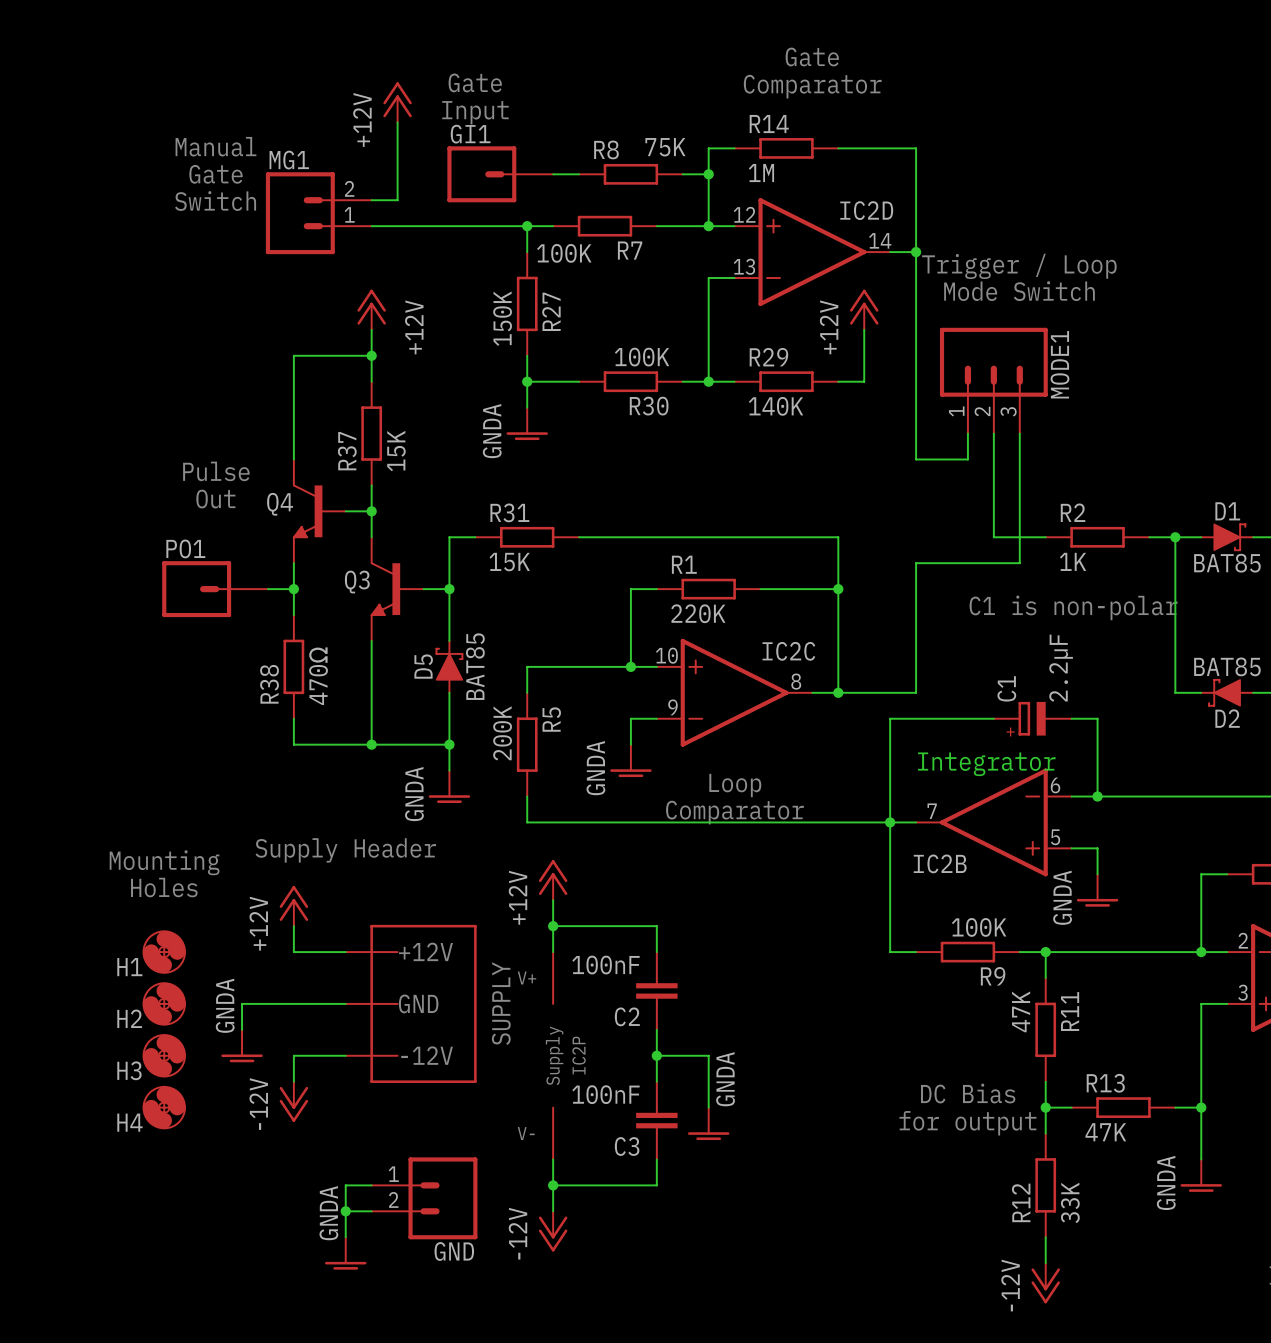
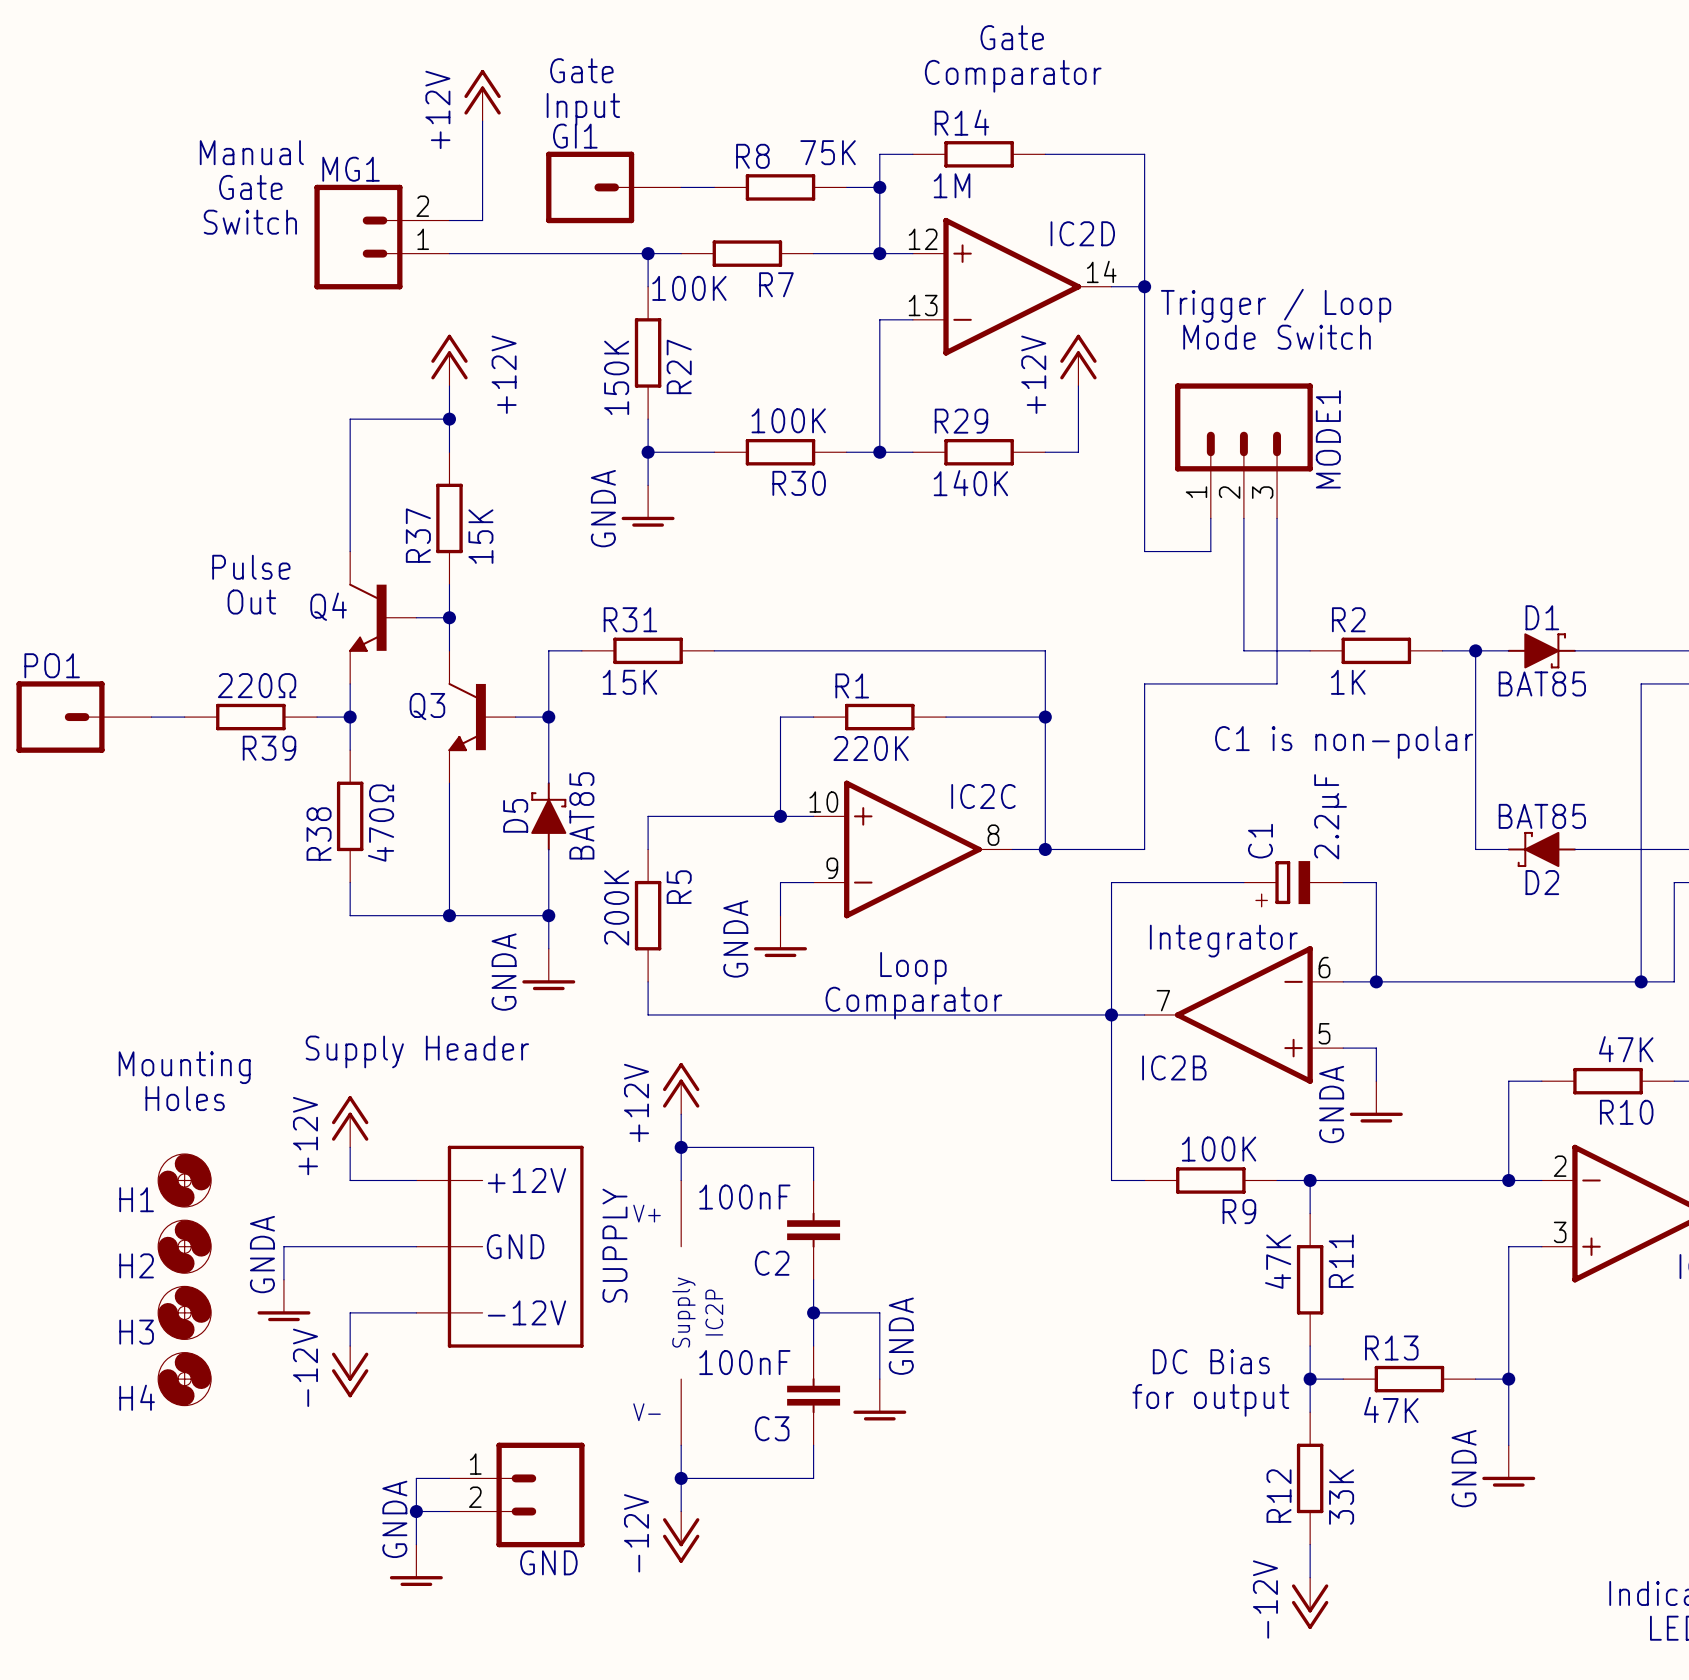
wire: none -> (151, 717) (184, 717)
PO1 position: (215, 589) -> (84, 717)
R39: none -> 220Ω (250, 717)

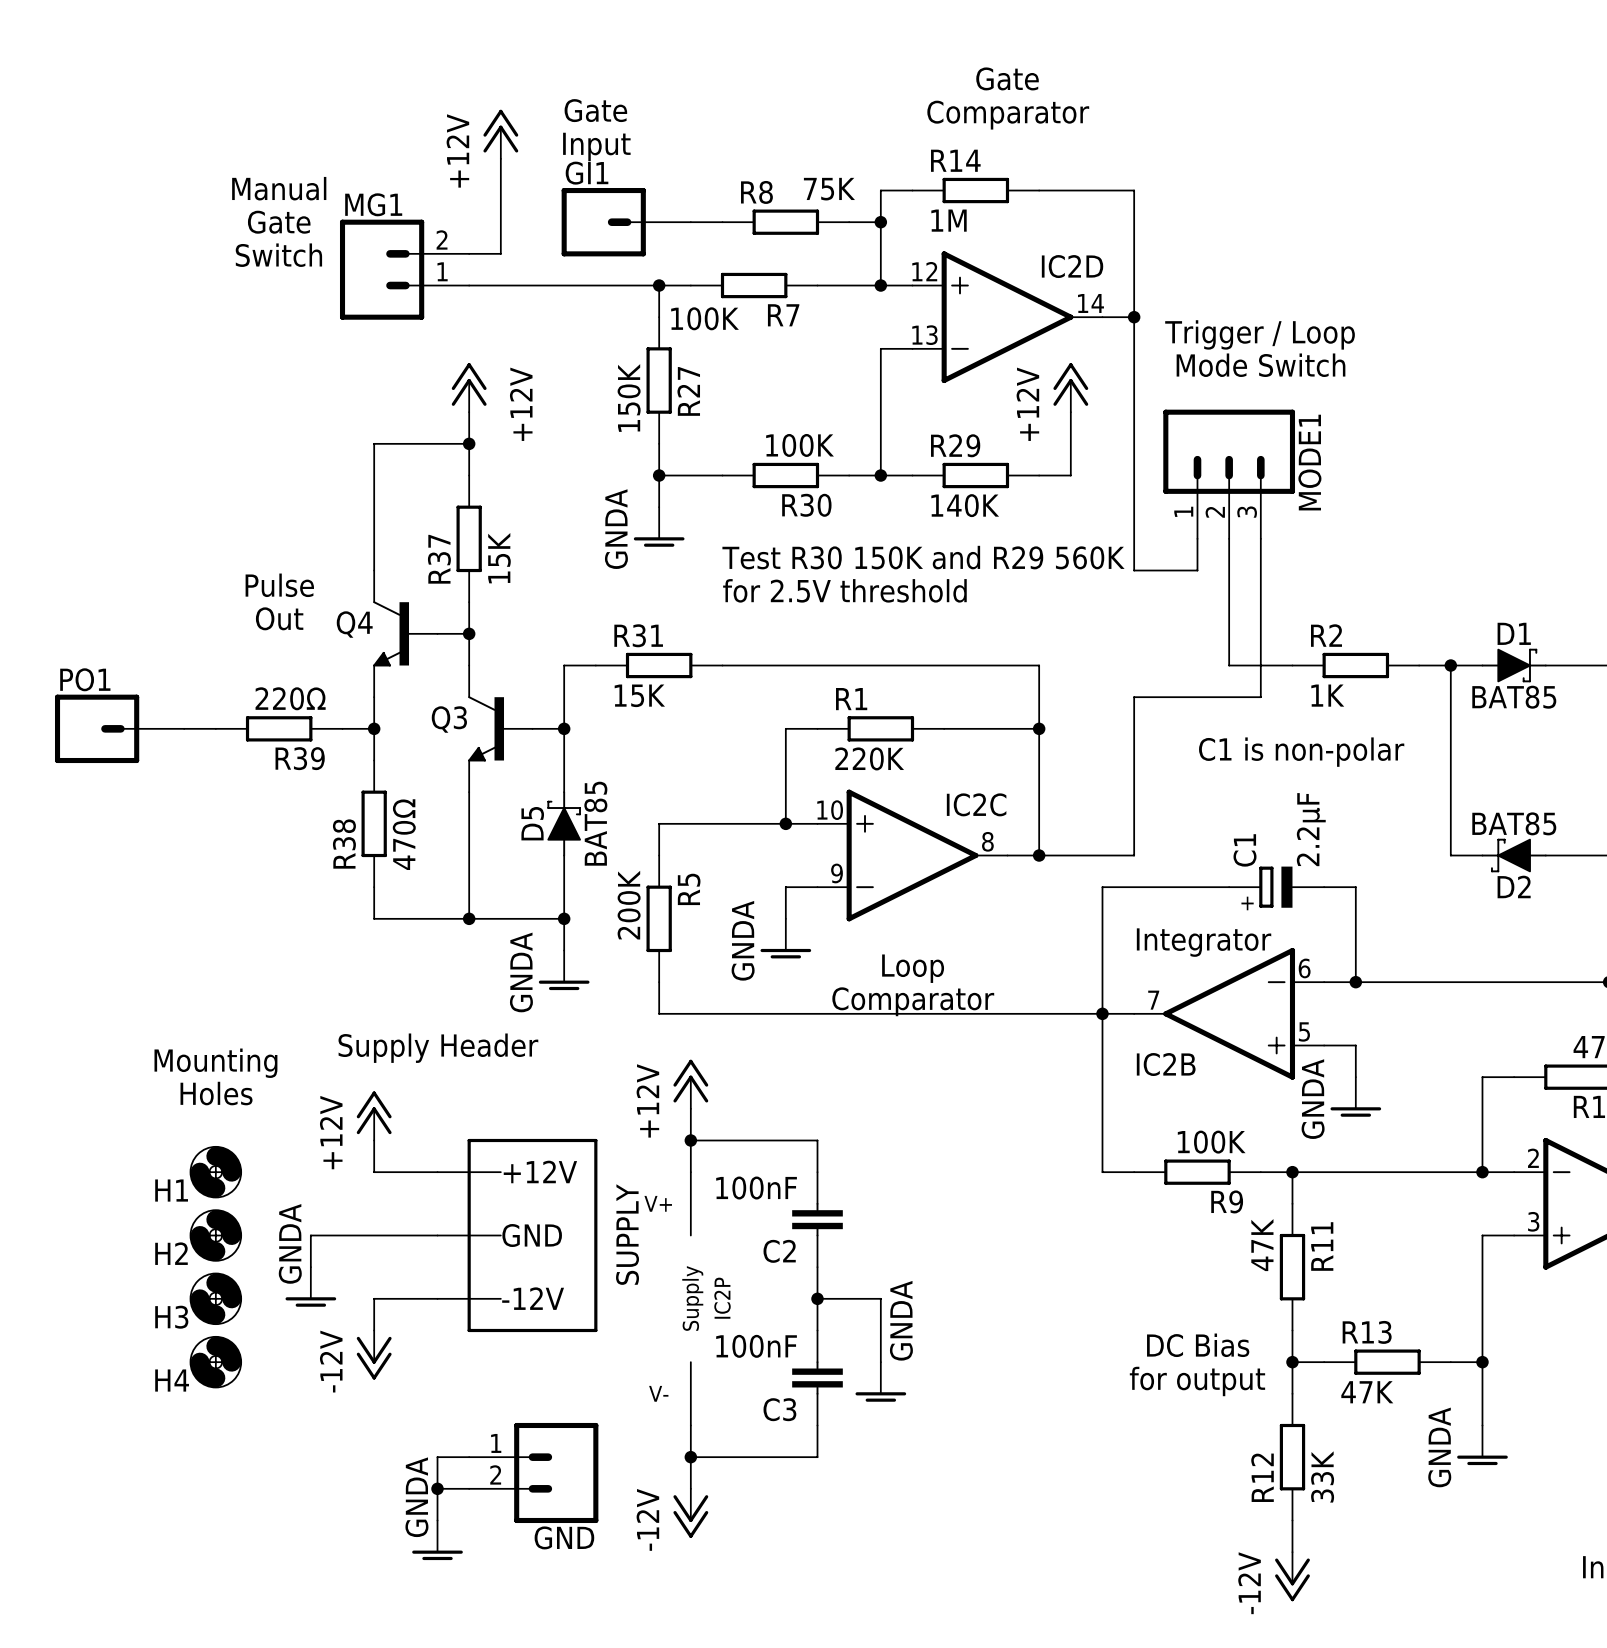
text: none -> Test R30 150K and R29 560K (923, 557)
text: none -> for 2.5V threshold (844, 590)

